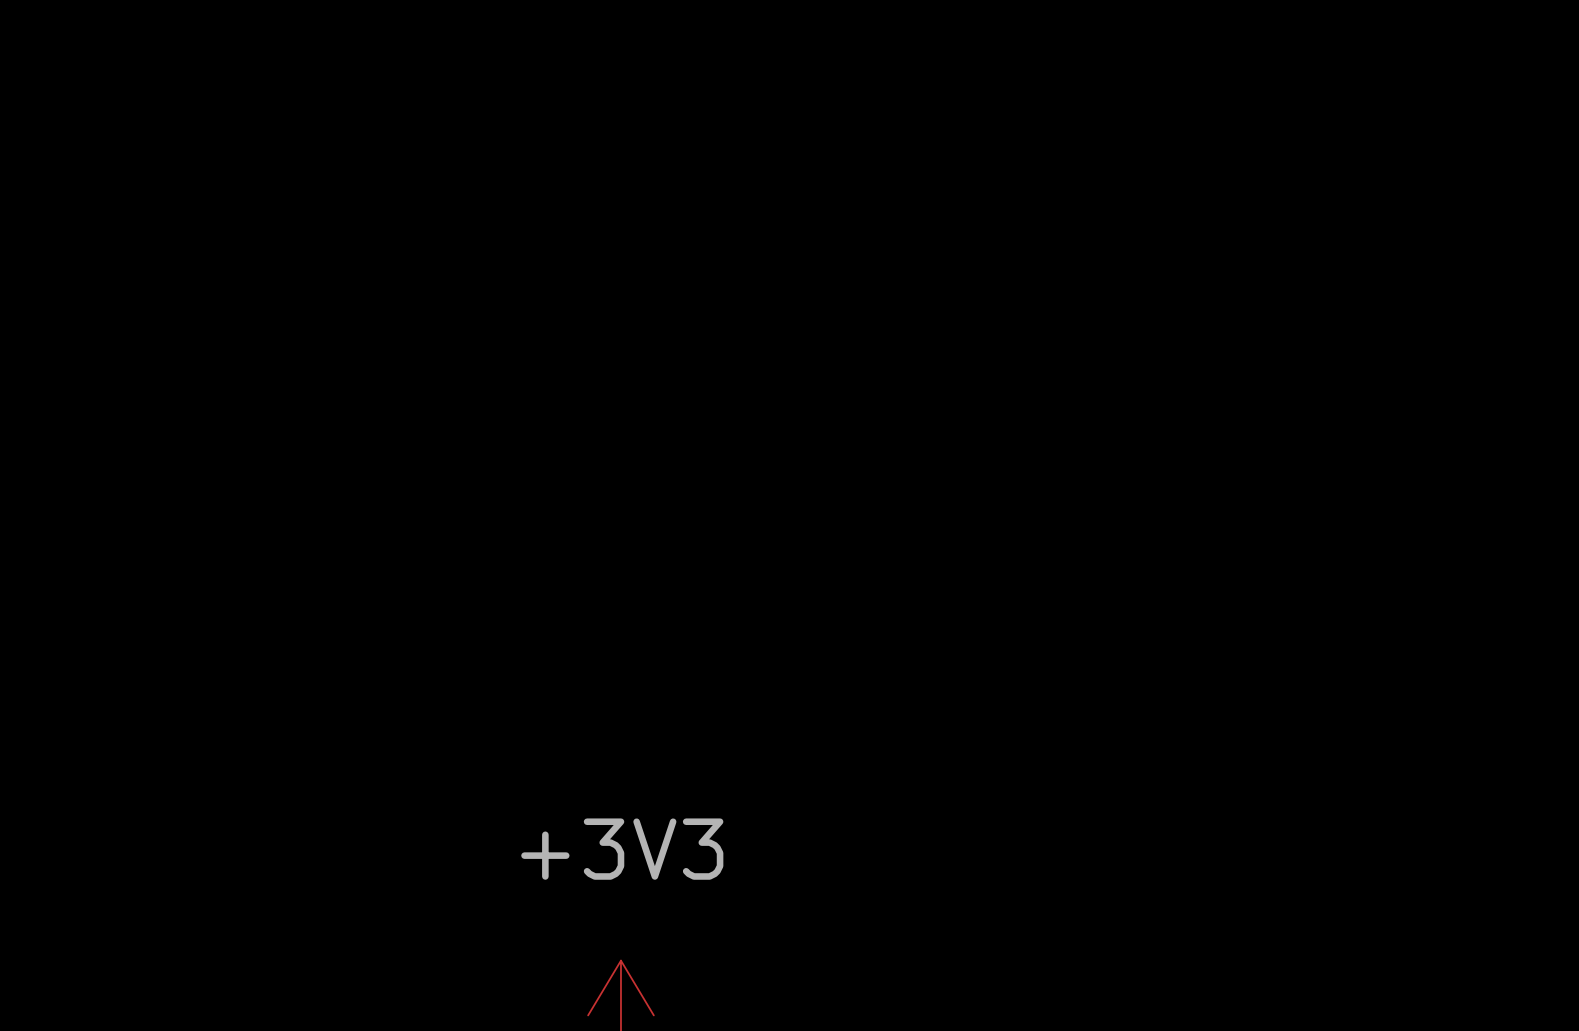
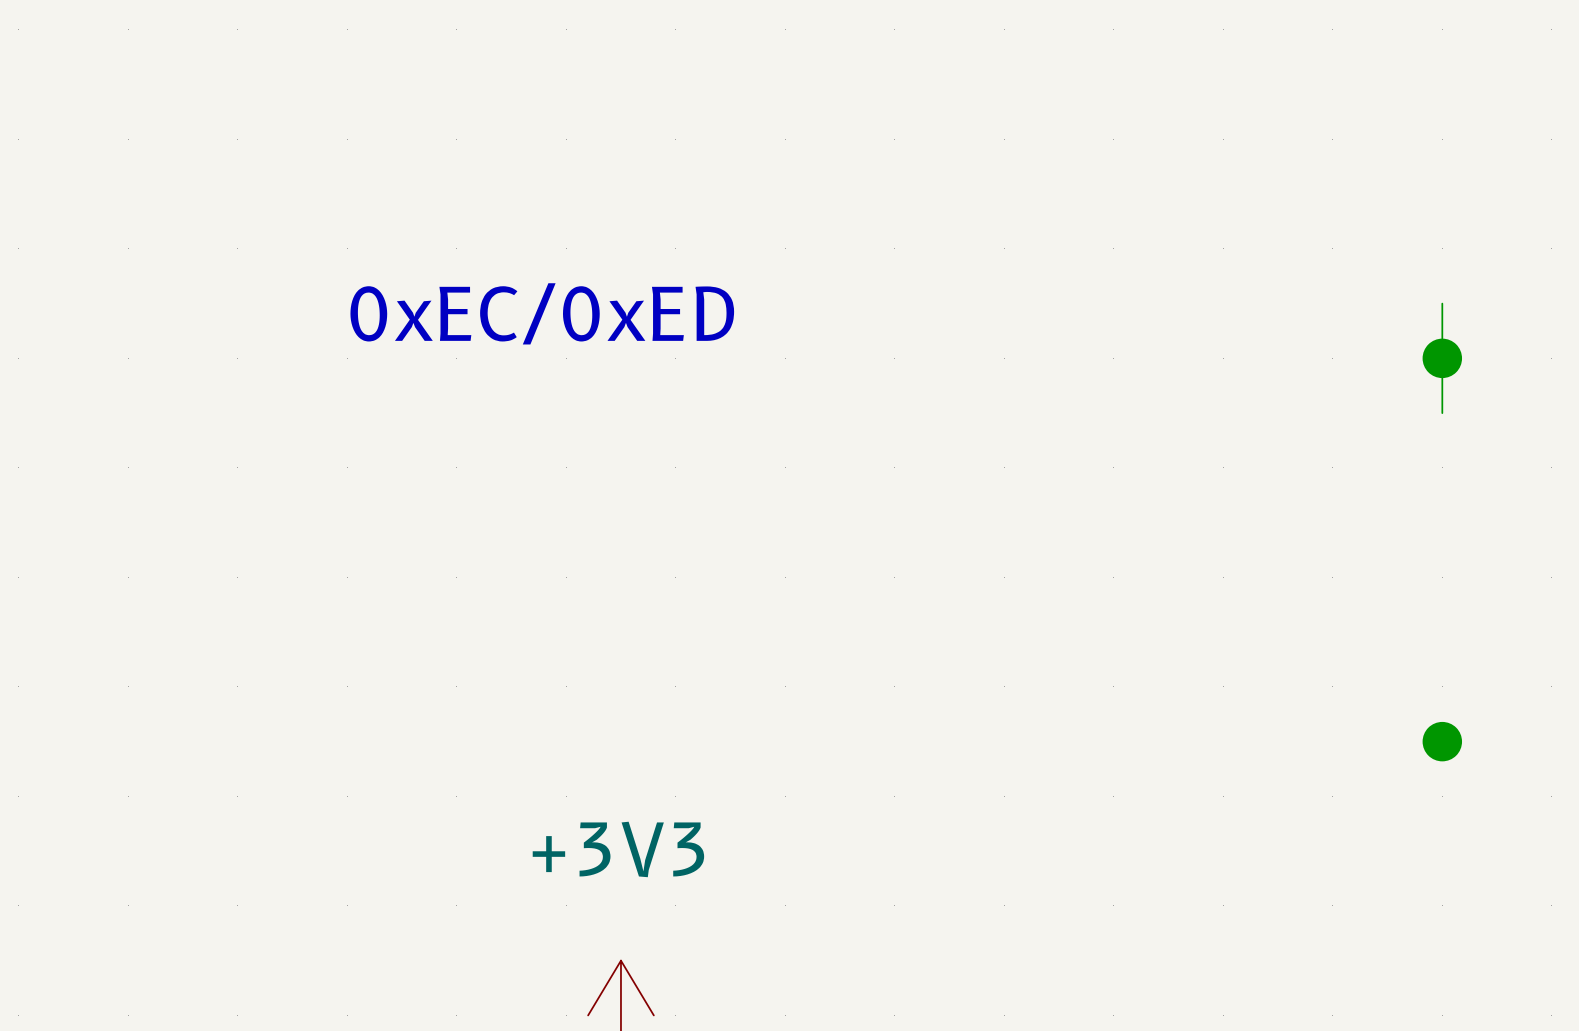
wire: none -> (1442, 303) (1442, 413)
text: none -> 0xEC/0xED (542, 313)
junction: none -> (1442, 358)
junction: none -> (1442, 741)

